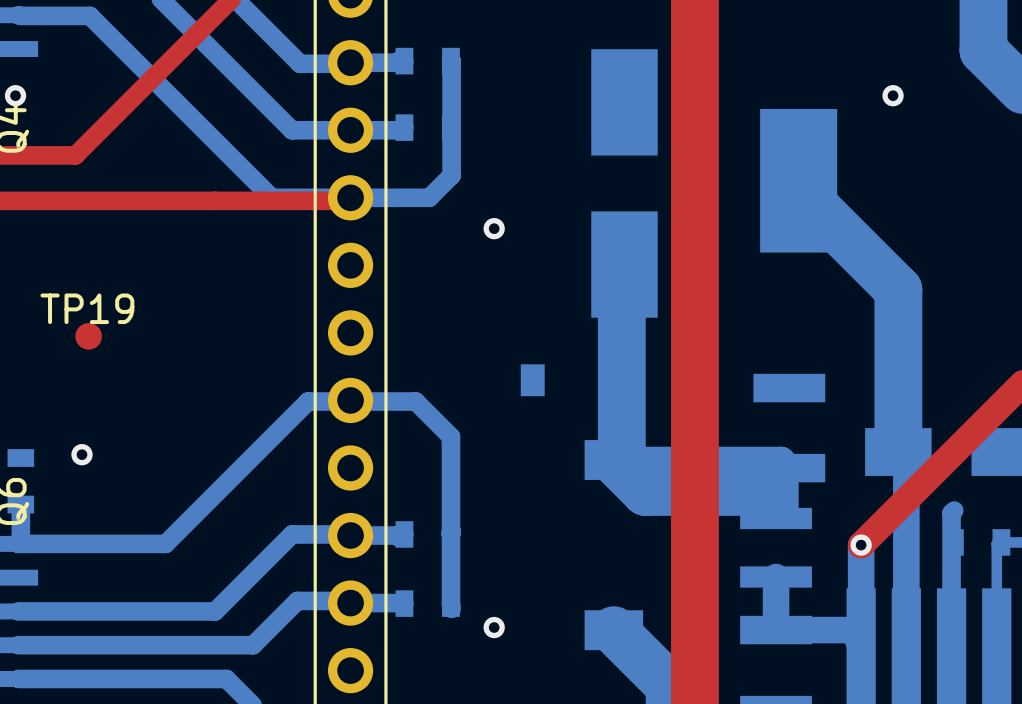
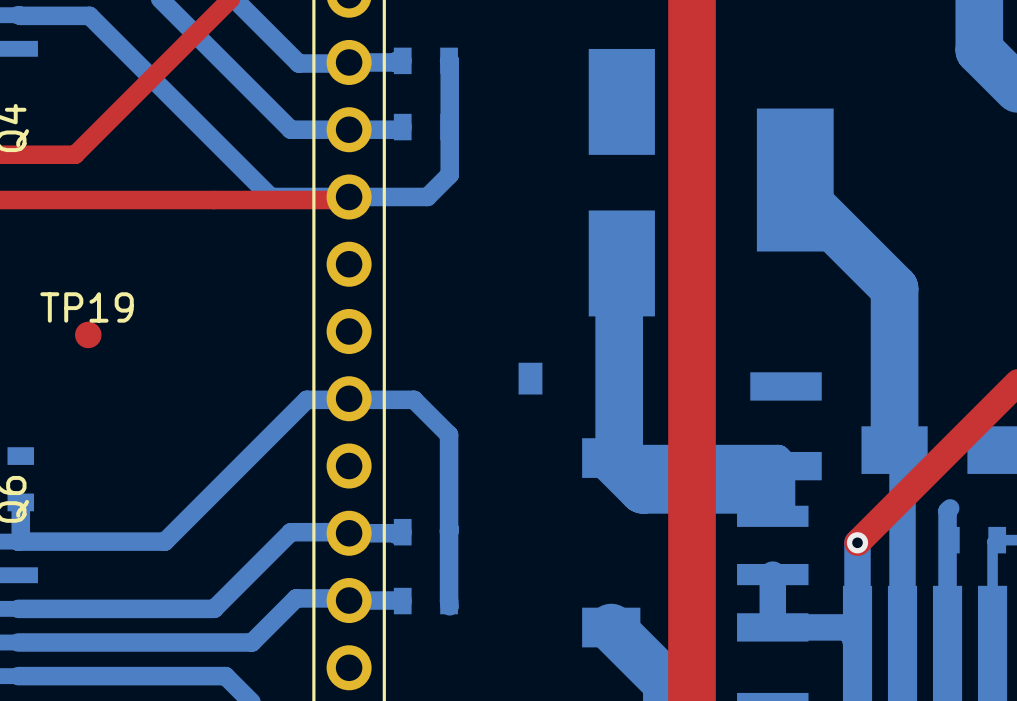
via: (15, 95) -> none
via: (893, 95) -> none
via: (494, 228) -> none
via: (82, 454) -> none
via: (494, 627) -> none

